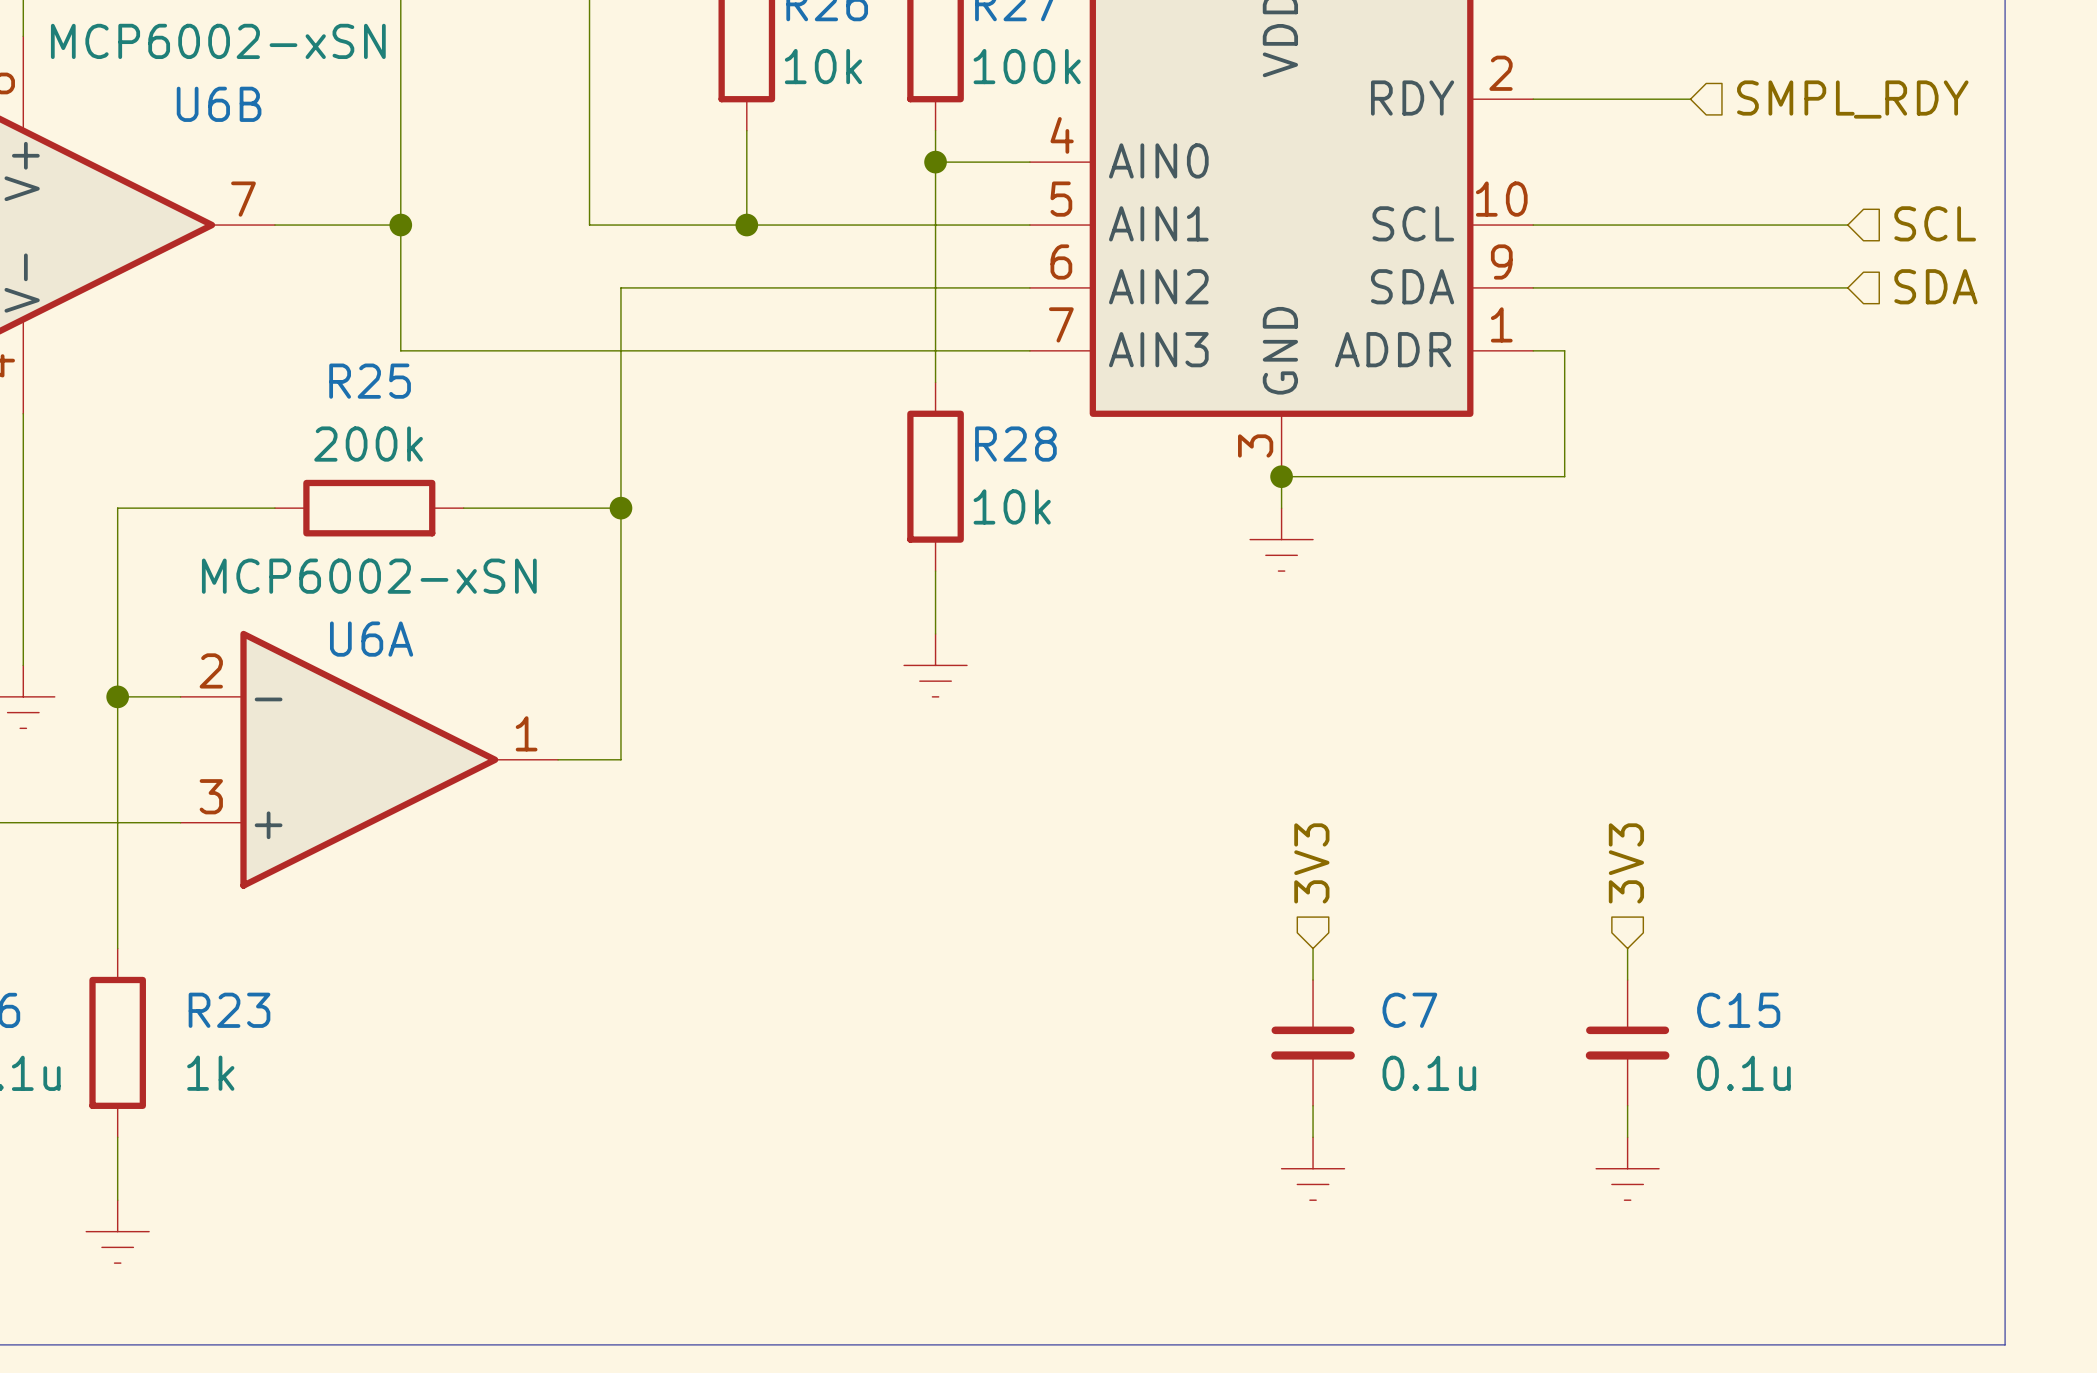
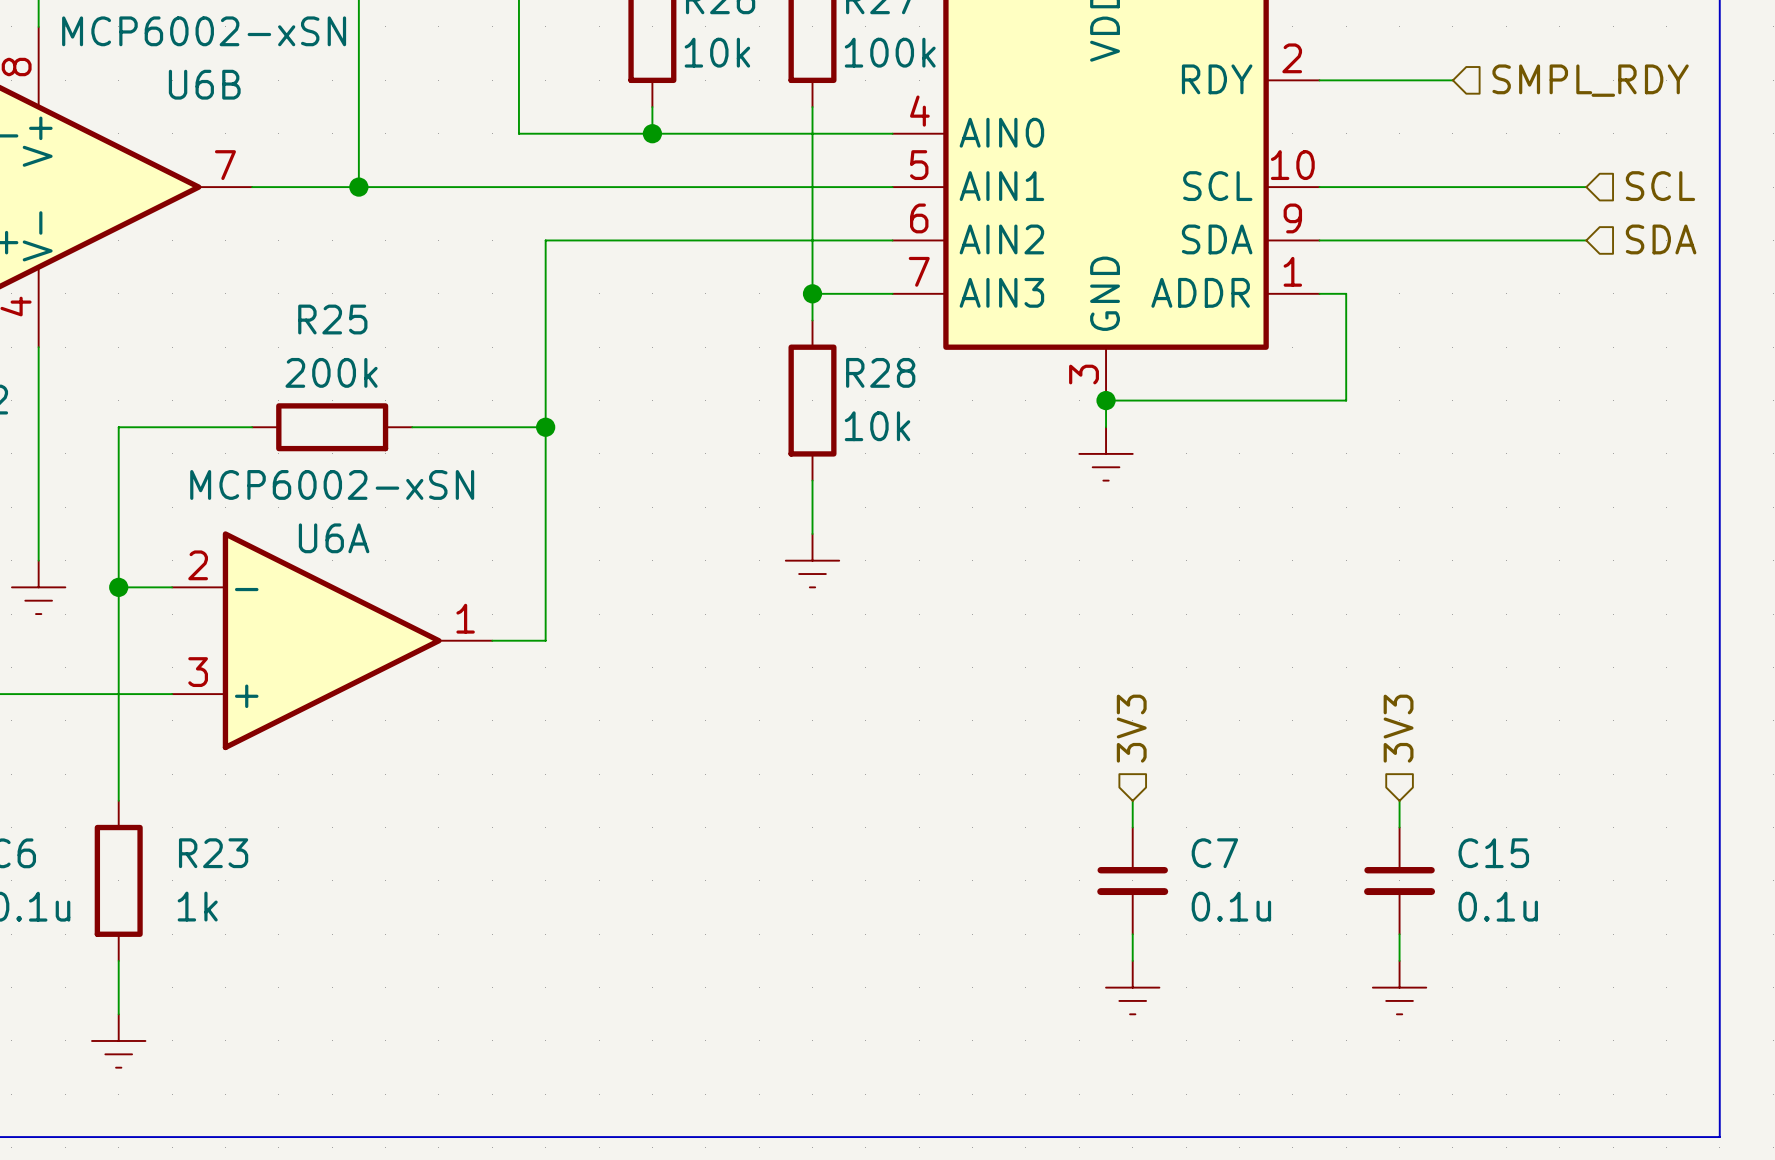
wire: (589, 162) (589, 225) -> (358, 187) (518, 187)
wire: none -> (518, 133) (812, 133)
wire: (746, 162) (746, 225) -> none
junction: (935, 162) -> none
wire: (400, 225) (400, 350) (935, 350) -> none
junction position: (746, 225) -> (652, 133)
junction: none -> (812, 293)

